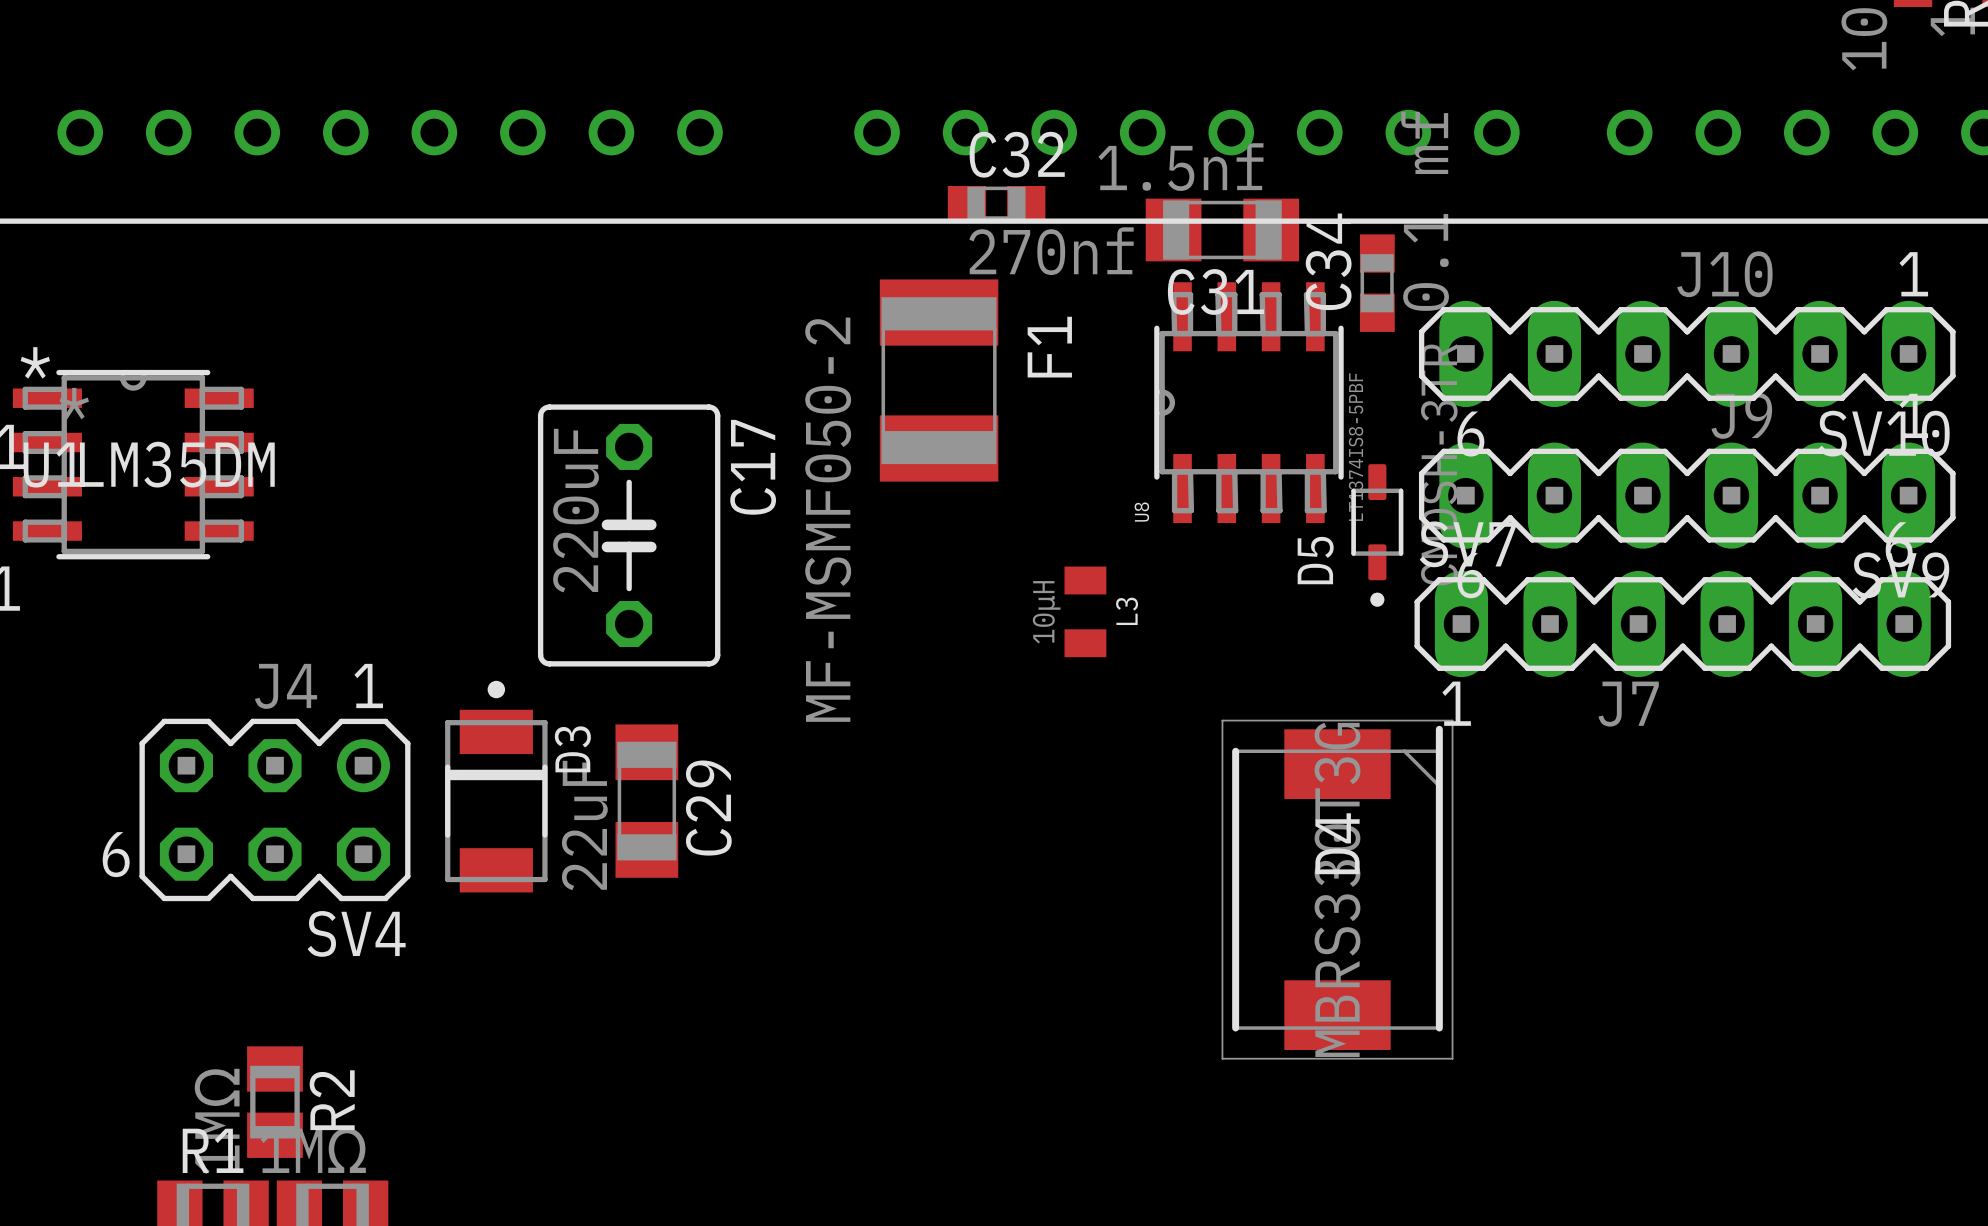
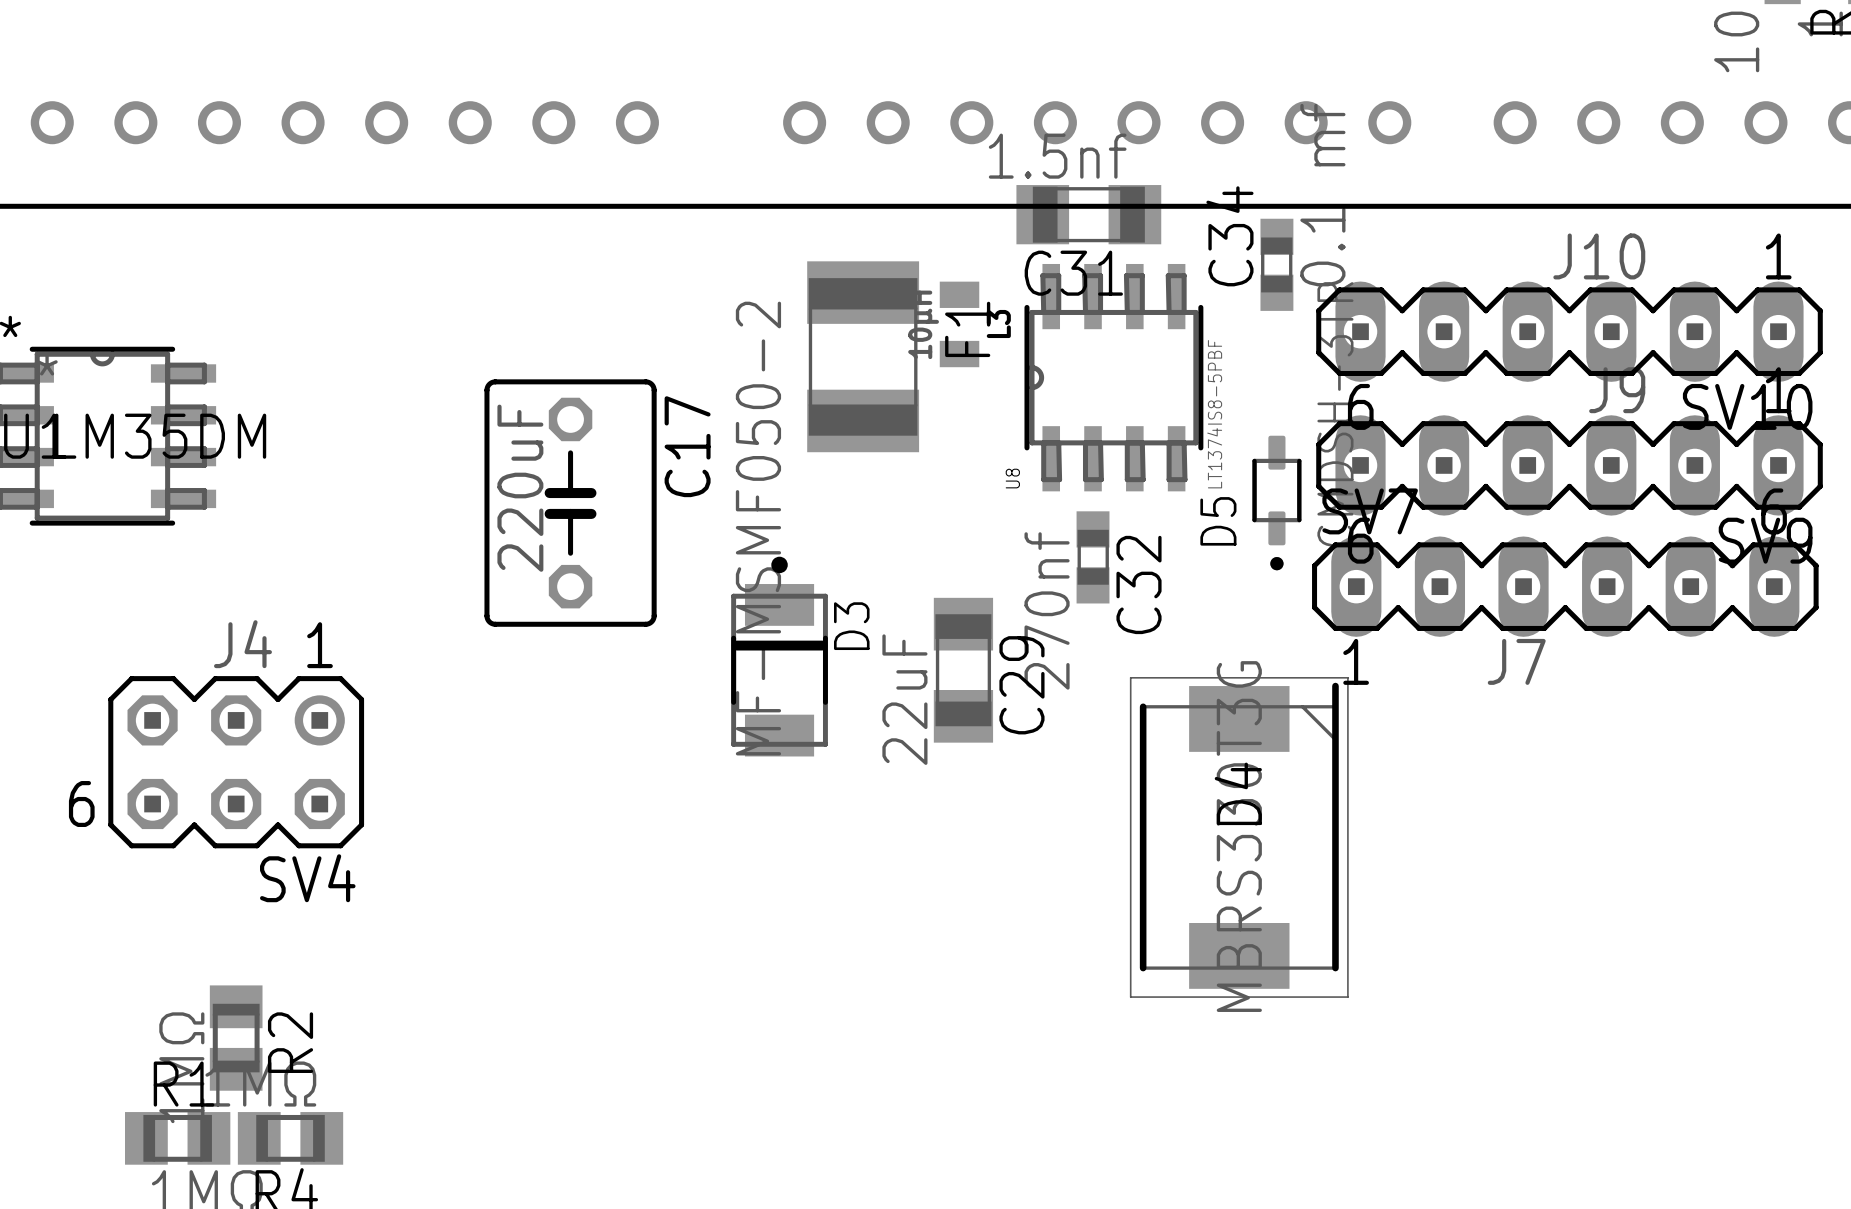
C32 rotation: 0° (996, 203) -> 90° clockwise (1093, 557)
C32 position: (996, 203) -> (1093, 557)
C31 position: (1222, 229) -> (1088, 214)
U8 position: (1248, 402) -> (1113, 377)
L3 position: (1085, 611) -> (959, 324)
D3 position: (496, 786) -> (779, 656)
C29 position: (646, 801) -> (963, 670)

